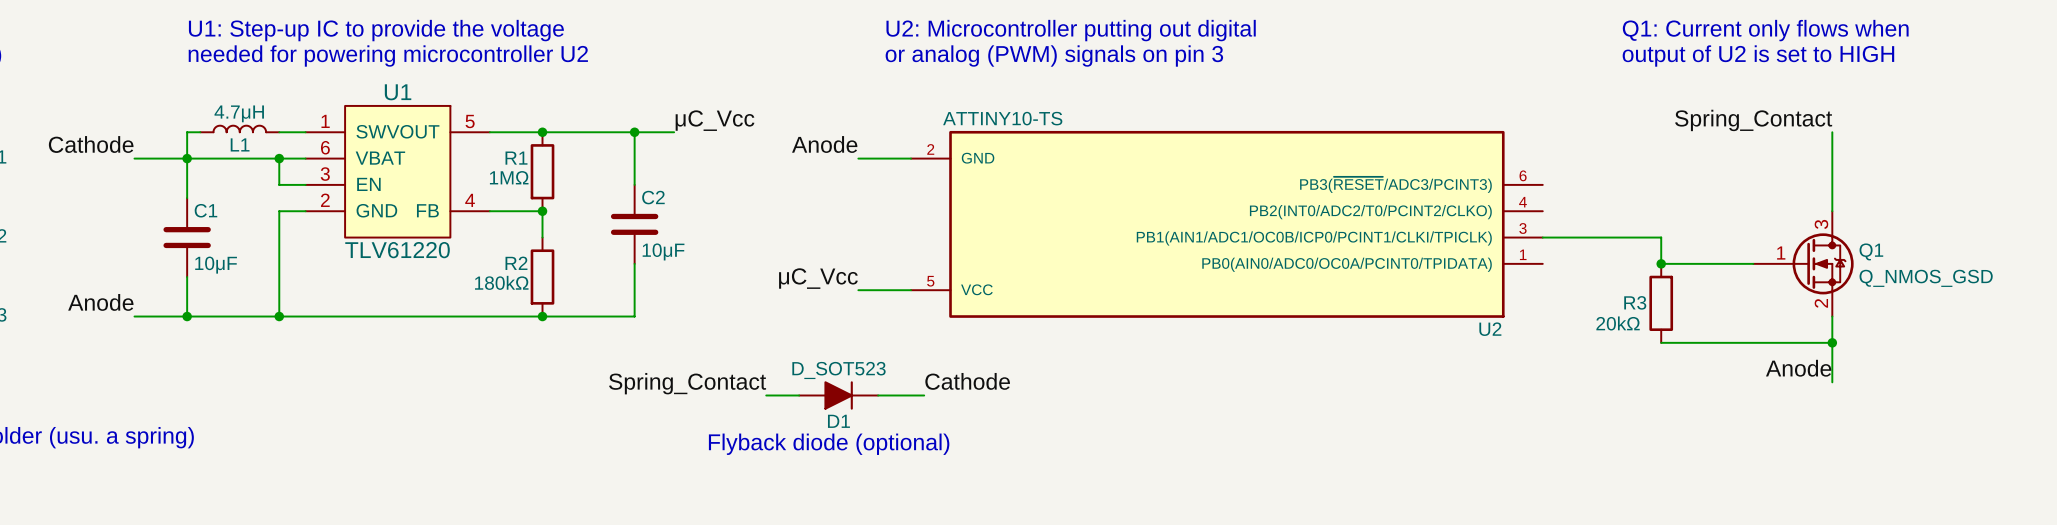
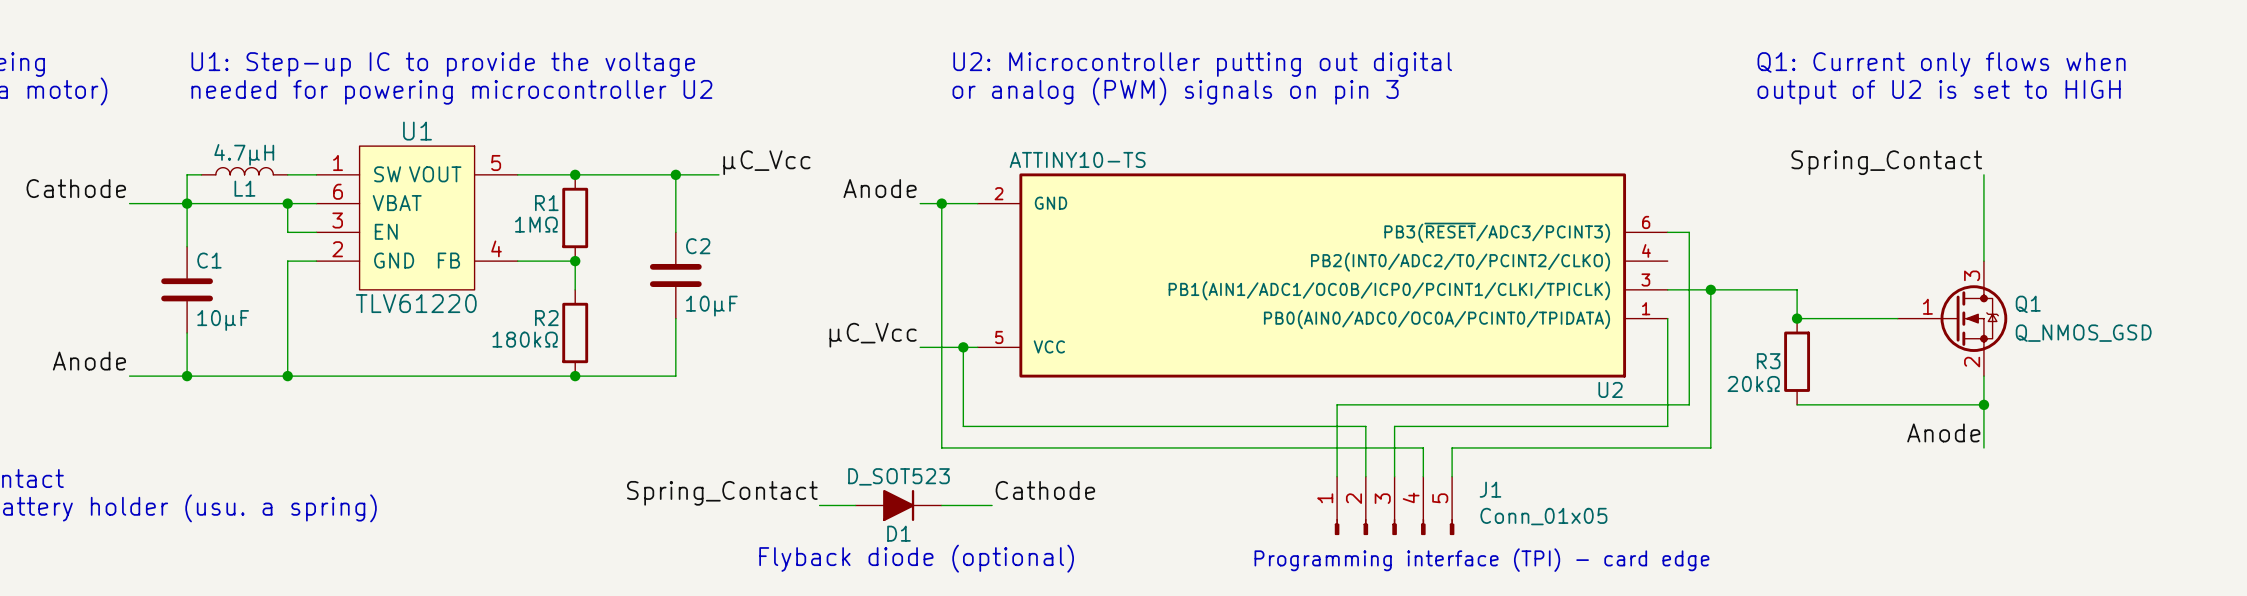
wire: none -> (941, 203) (941, 447) (1423, 447) (1423, 476)
junction: none -> (941, 203)
wire: none -> (1667, 232) (1689, 232) (1689, 404) (1337, 404) (1337, 476)
wire: none -> (1710, 289) (1710, 447) (1452, 447) (1452, 476)
junction: none -> (1710, 289)
wire: none -> (1667, 318) (1667, 426) (1394, 426) (1394, 476)
wire: none -> (963, 347) (963, 426) (1365, 426) (1365, 476)
junction: none -> (963, 347)
label position: Cathode (967, 381) -> Cathode (1045, 490)
label position: Spring_Contact (687, 383) -> Spring_Contact (722, 493)
wire: (766, 395) (799, 395) -> (819, 505) (855, 505)
D1 position: (838, 395) -> (898, 505)
wire: (878, 395) (924, 395) -> (941, 505) (992, 505)
J1: none -> Conn_01x05 (1394, 505)
text position: Flyback diode (optional) (829, 444) -> Flyback diode (optional) (916, 558)
text: none -> Programming interface (TPI) - card edge (1481, 560)

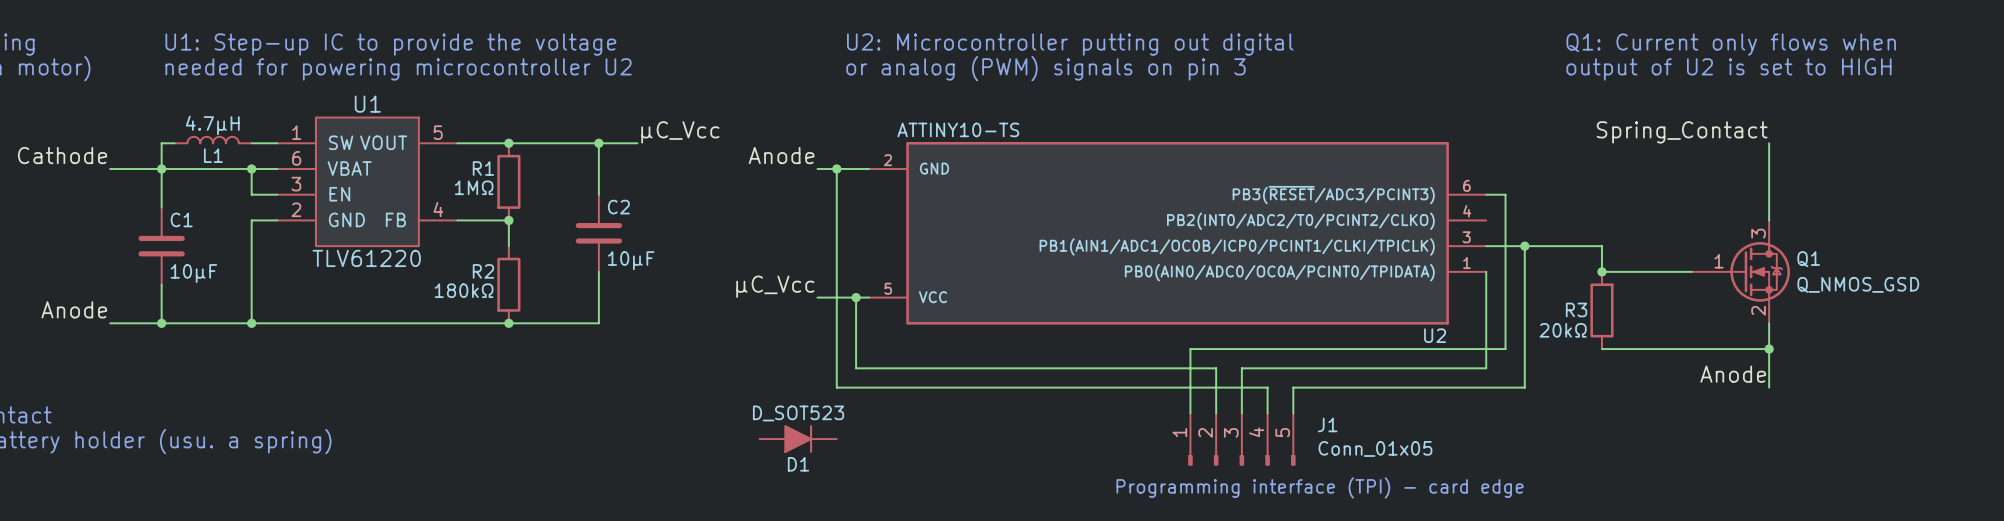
label: Cathode (1045, 490) -> none
label: Spring_Contact (722, 493) -> none
wire: (819, 505) (855, 505) -> none
wire: (941, 505) (992, 505) -> none
text: Flyback diode (optional) (916, 558) -> none

